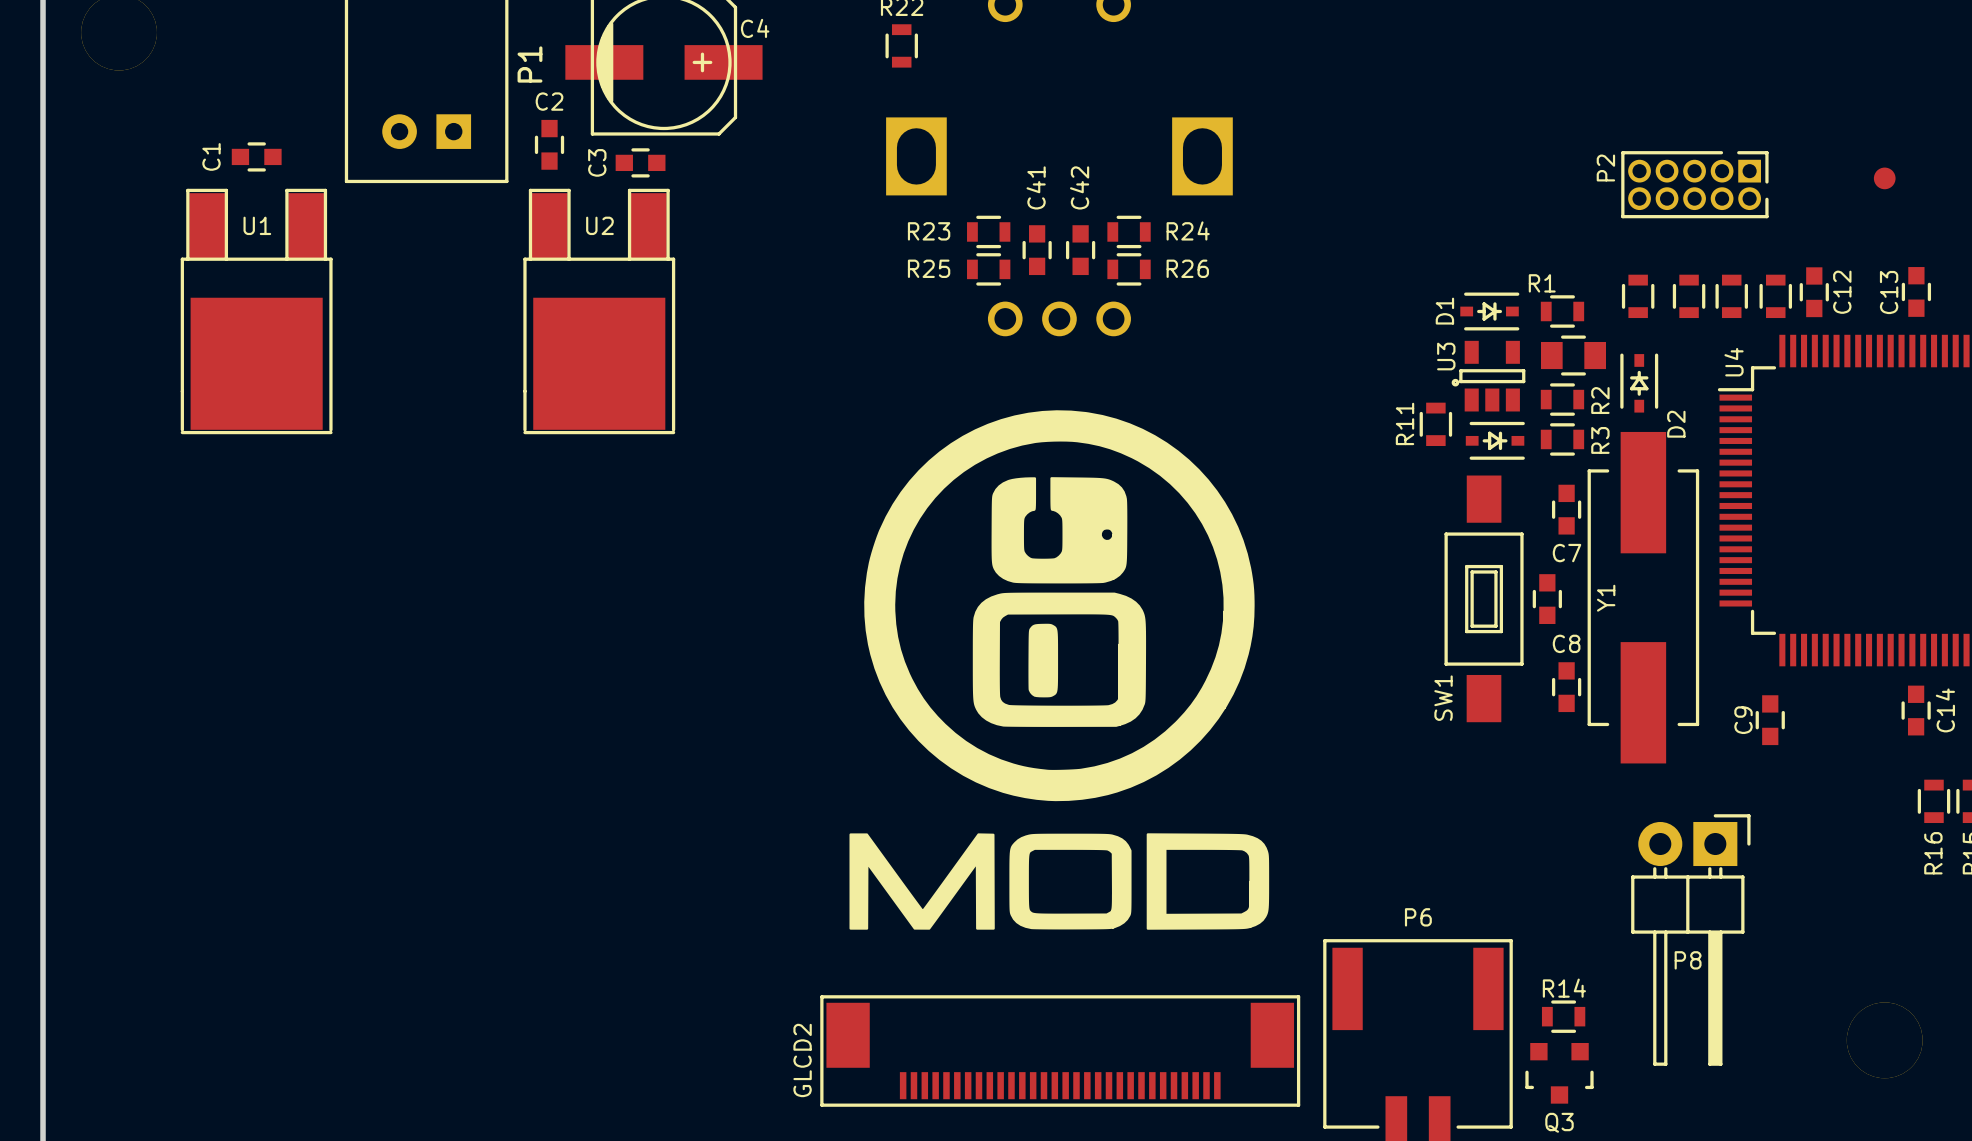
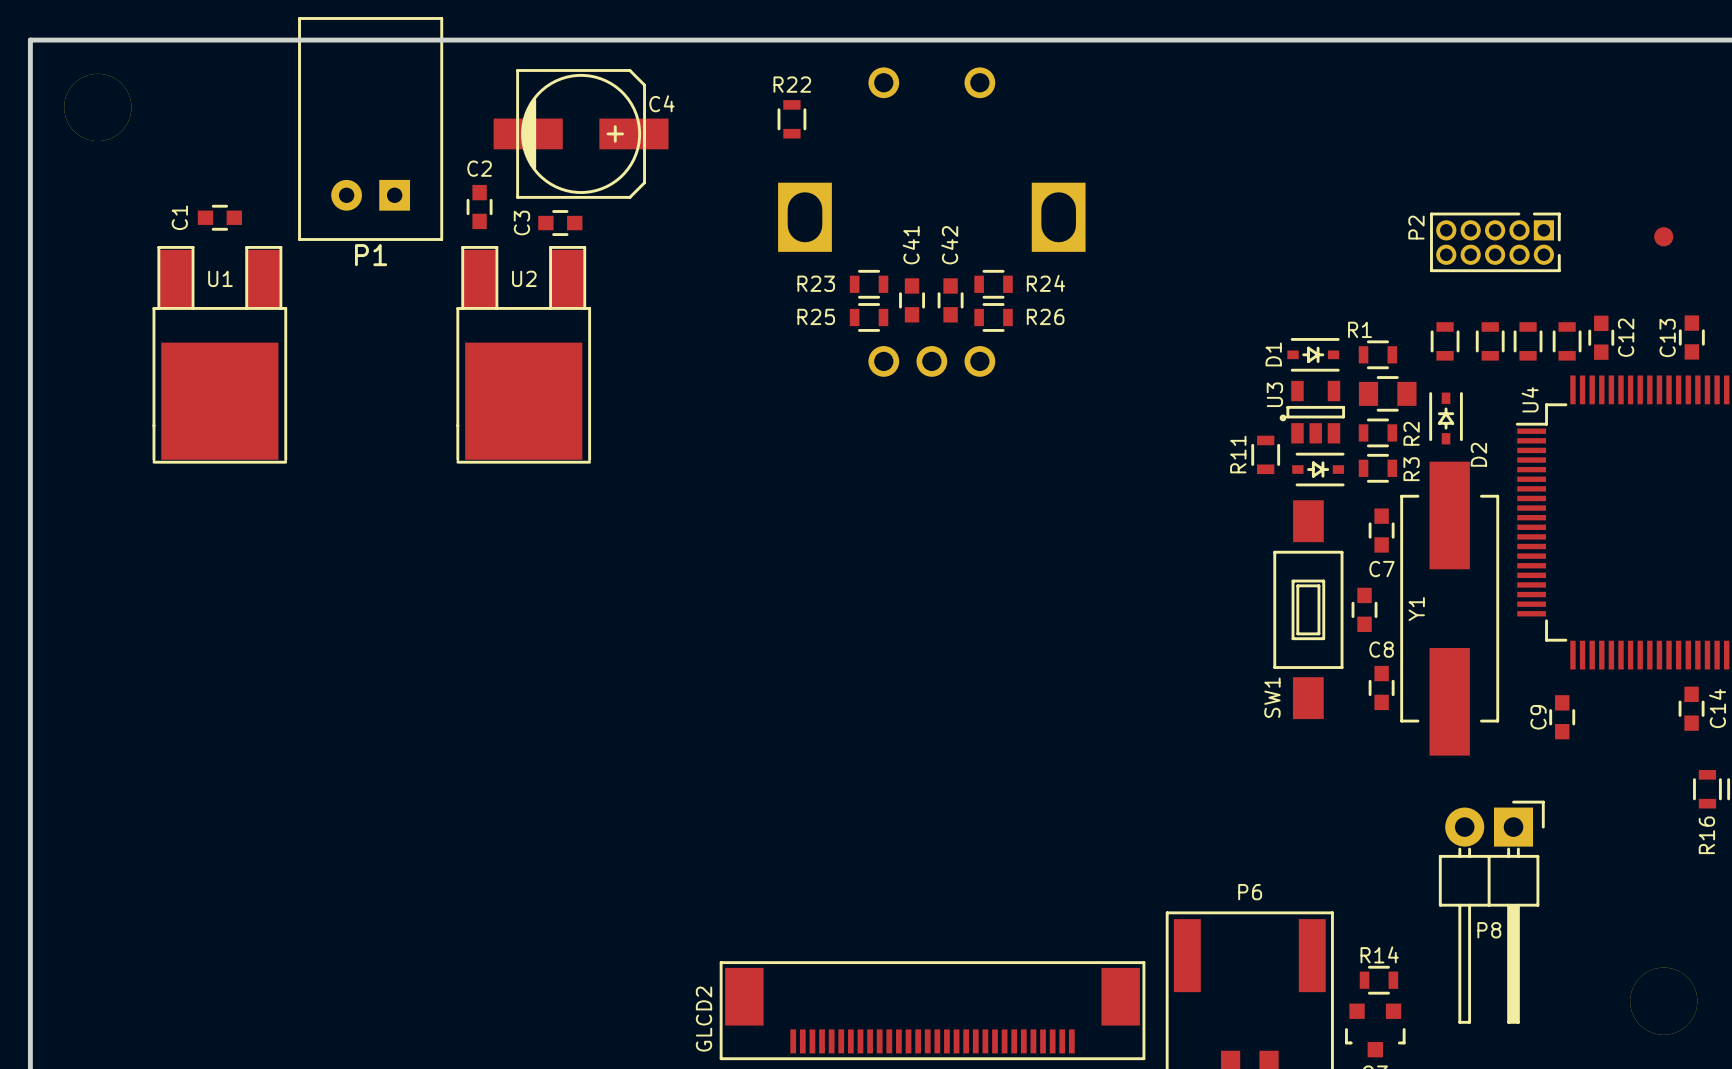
P1 name rotation: 0° (529, 64) -> 90° clockwise (371, 255)
P1 name position: P1 (529, 64) -> P1 (371, 255)
drawing: [849, 410, 1270, 930] -> none

